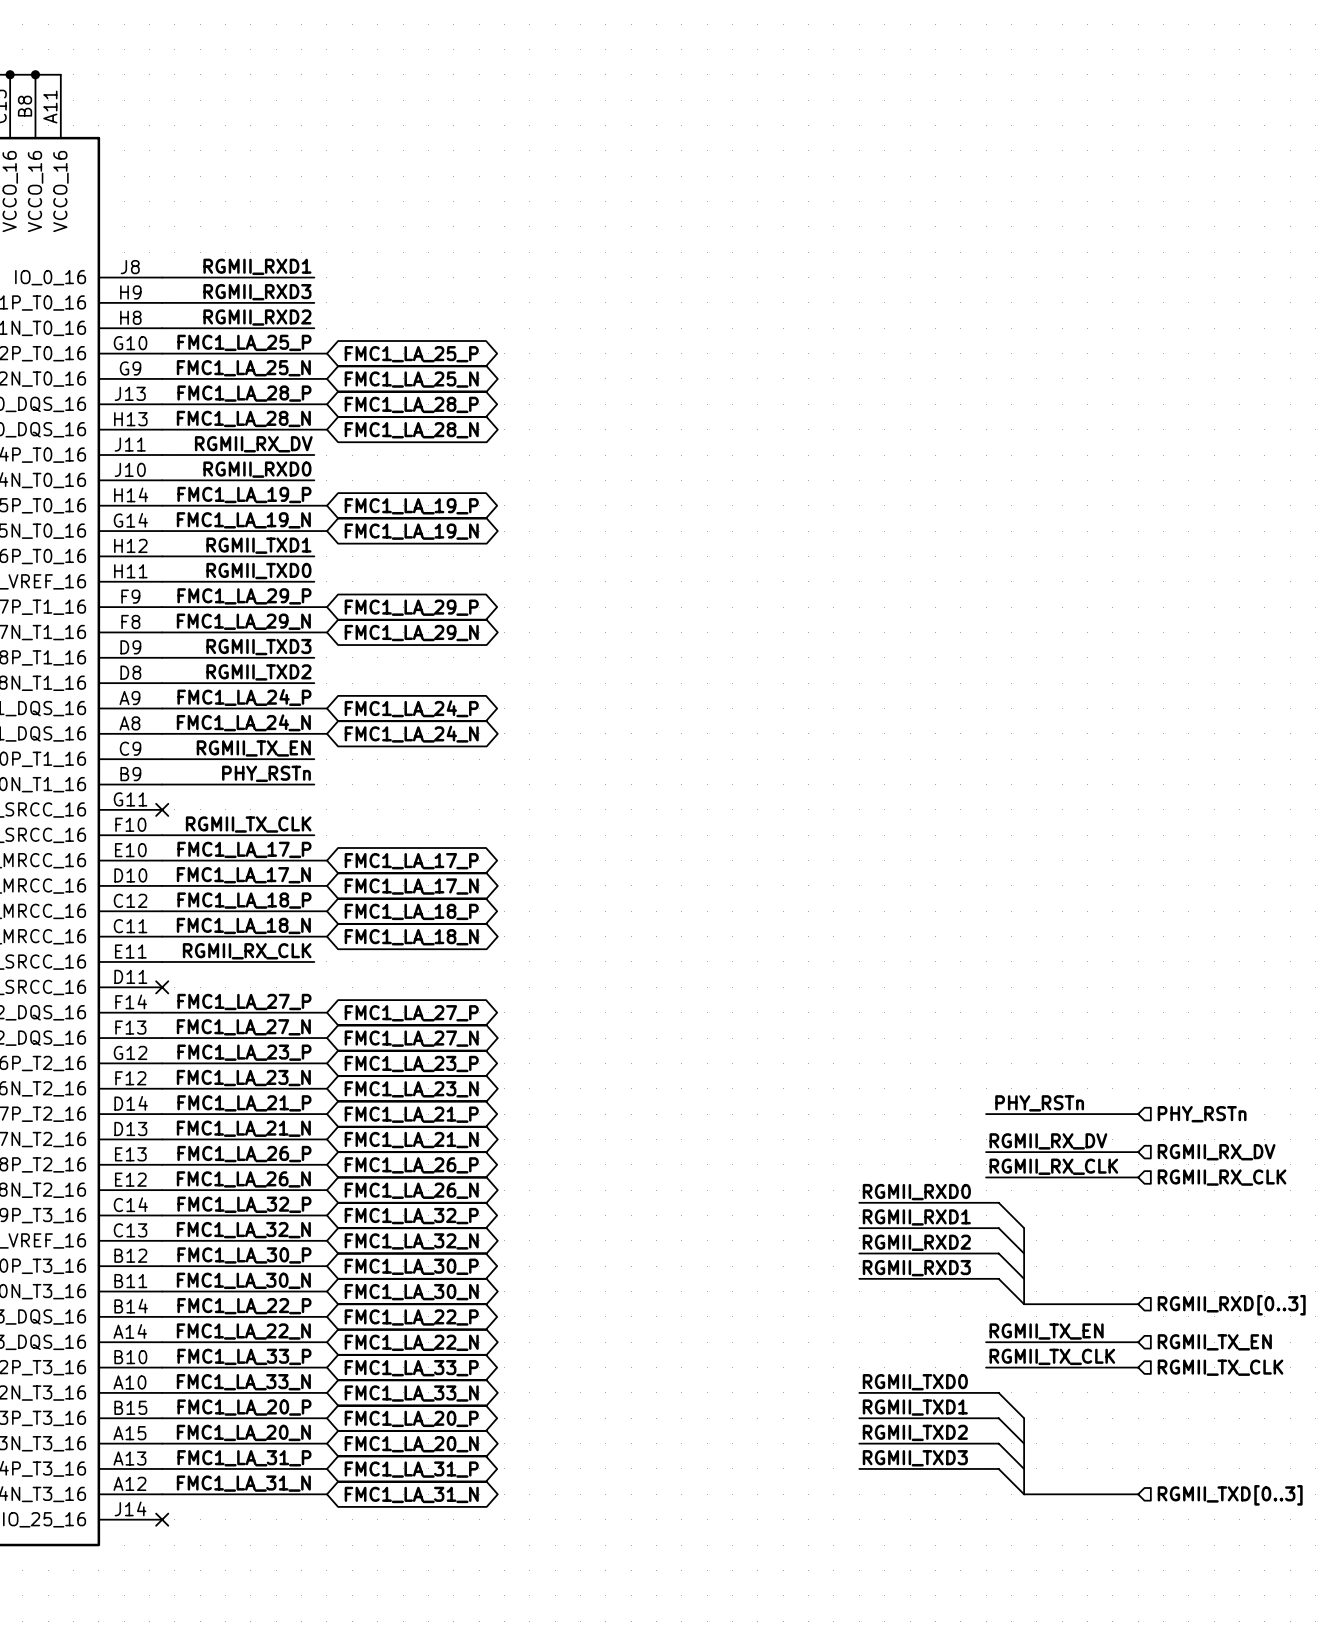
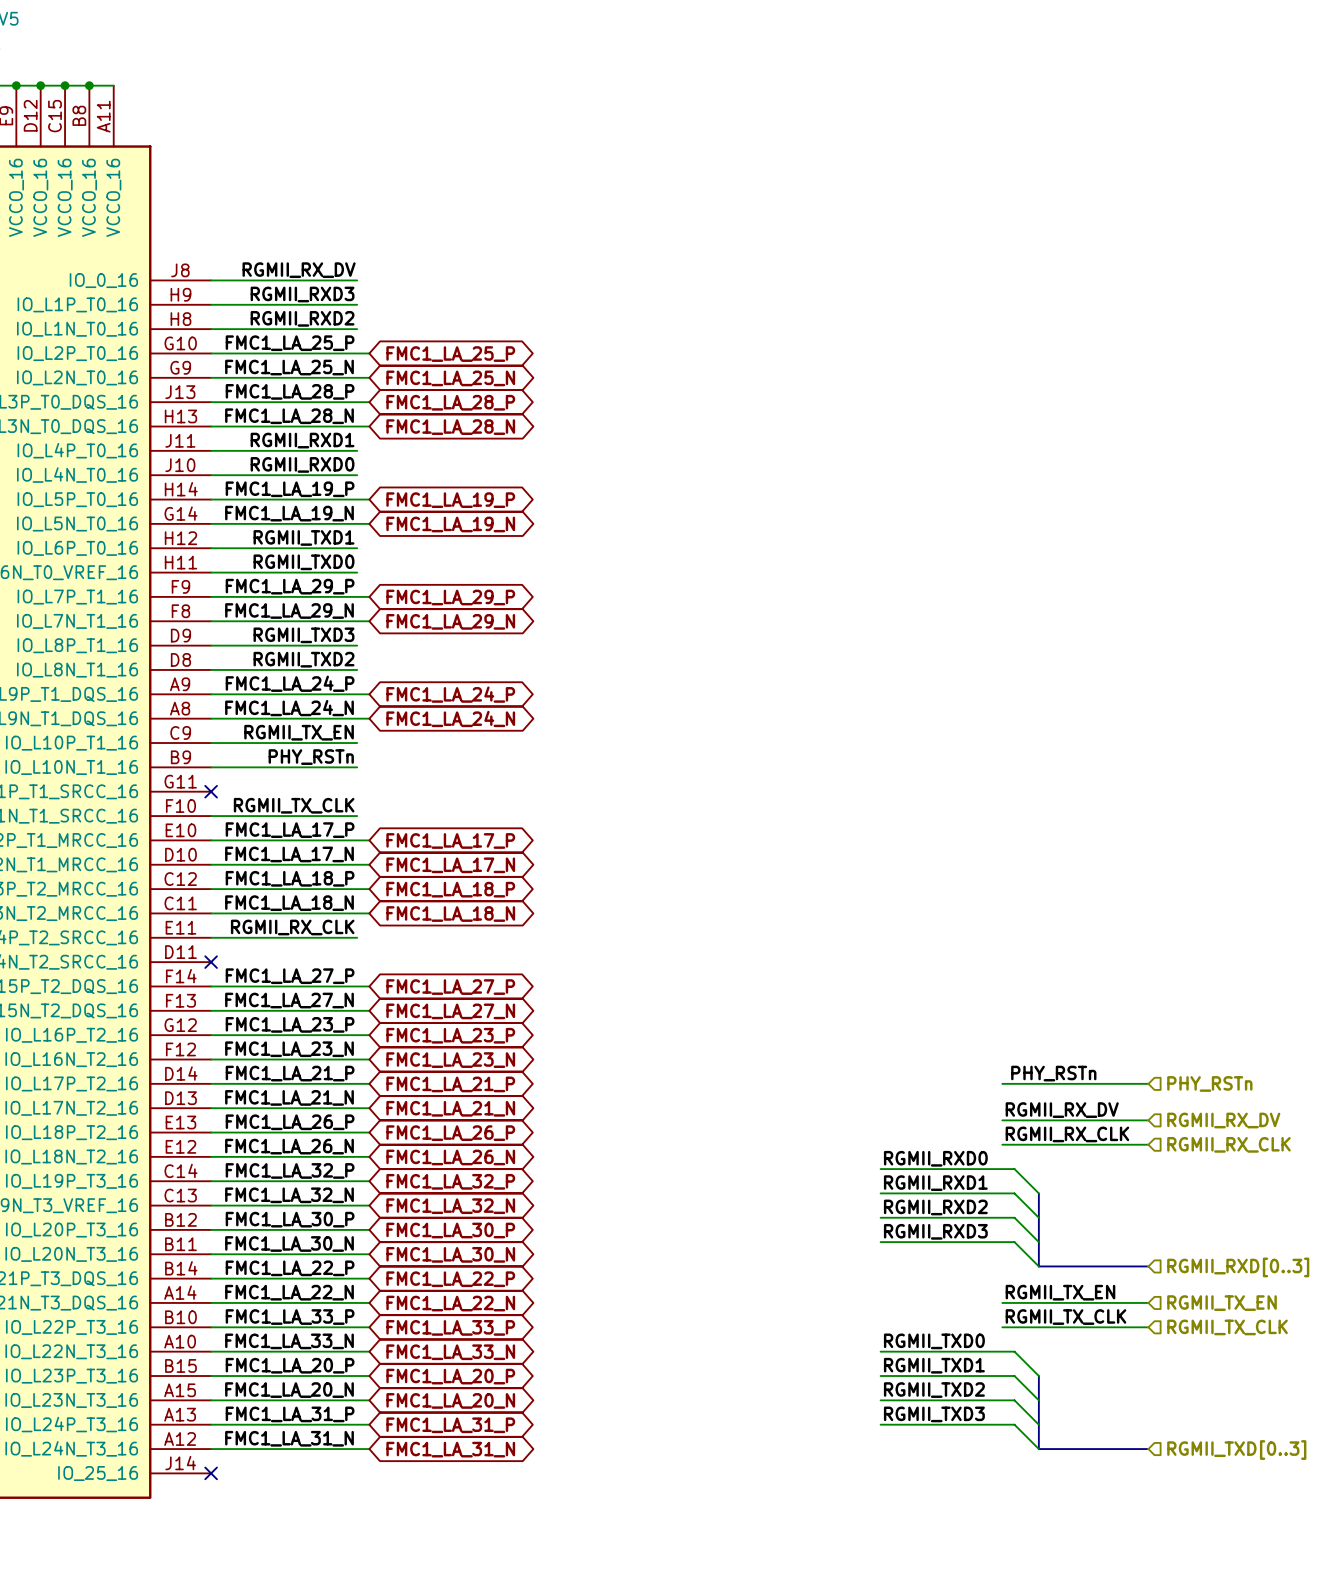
label: RGMII_RXD1 (257, 266) -> RGMII_RX_DV (299, 270)
label: RGMII_RX_DV (253, 444) -> RGMII_RXD1 (302, 440)

